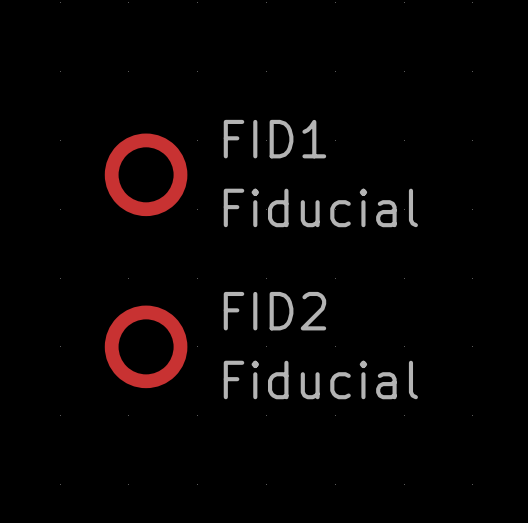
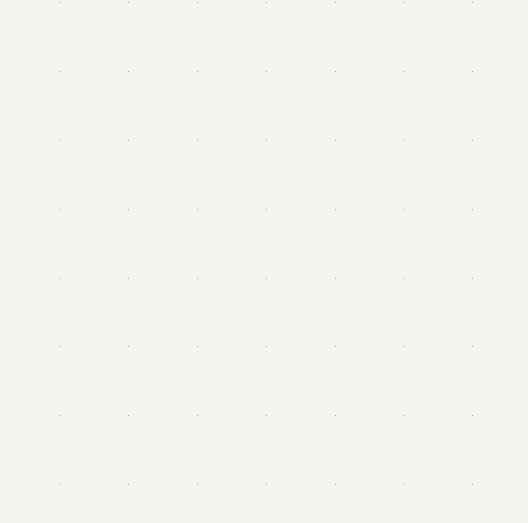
FID1: Fiducial (146, 174) -> none
FID2: Fiducial (146, 346) -> none

